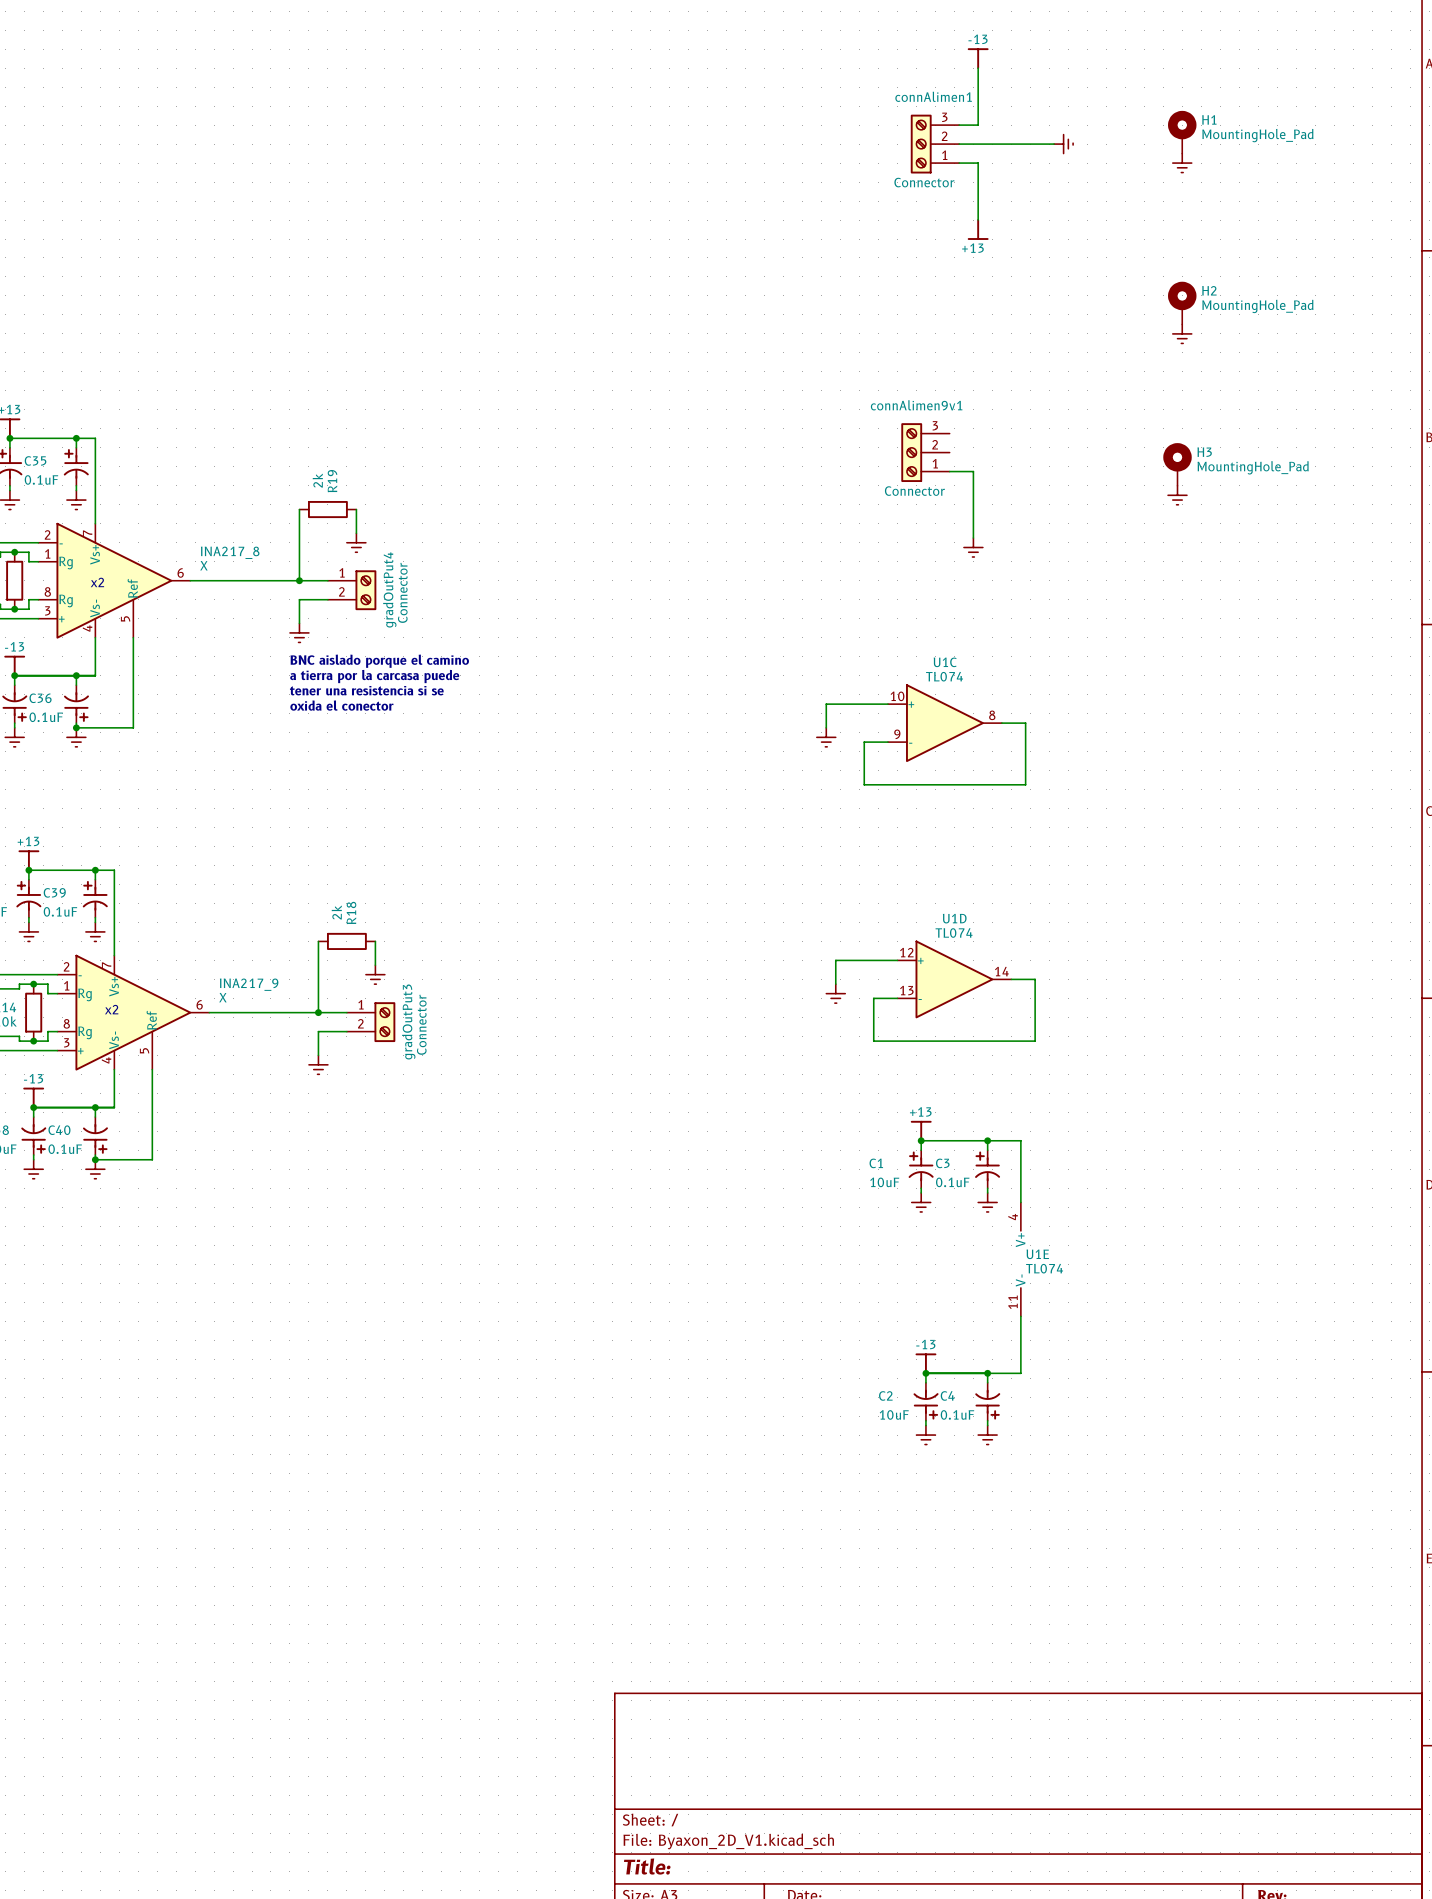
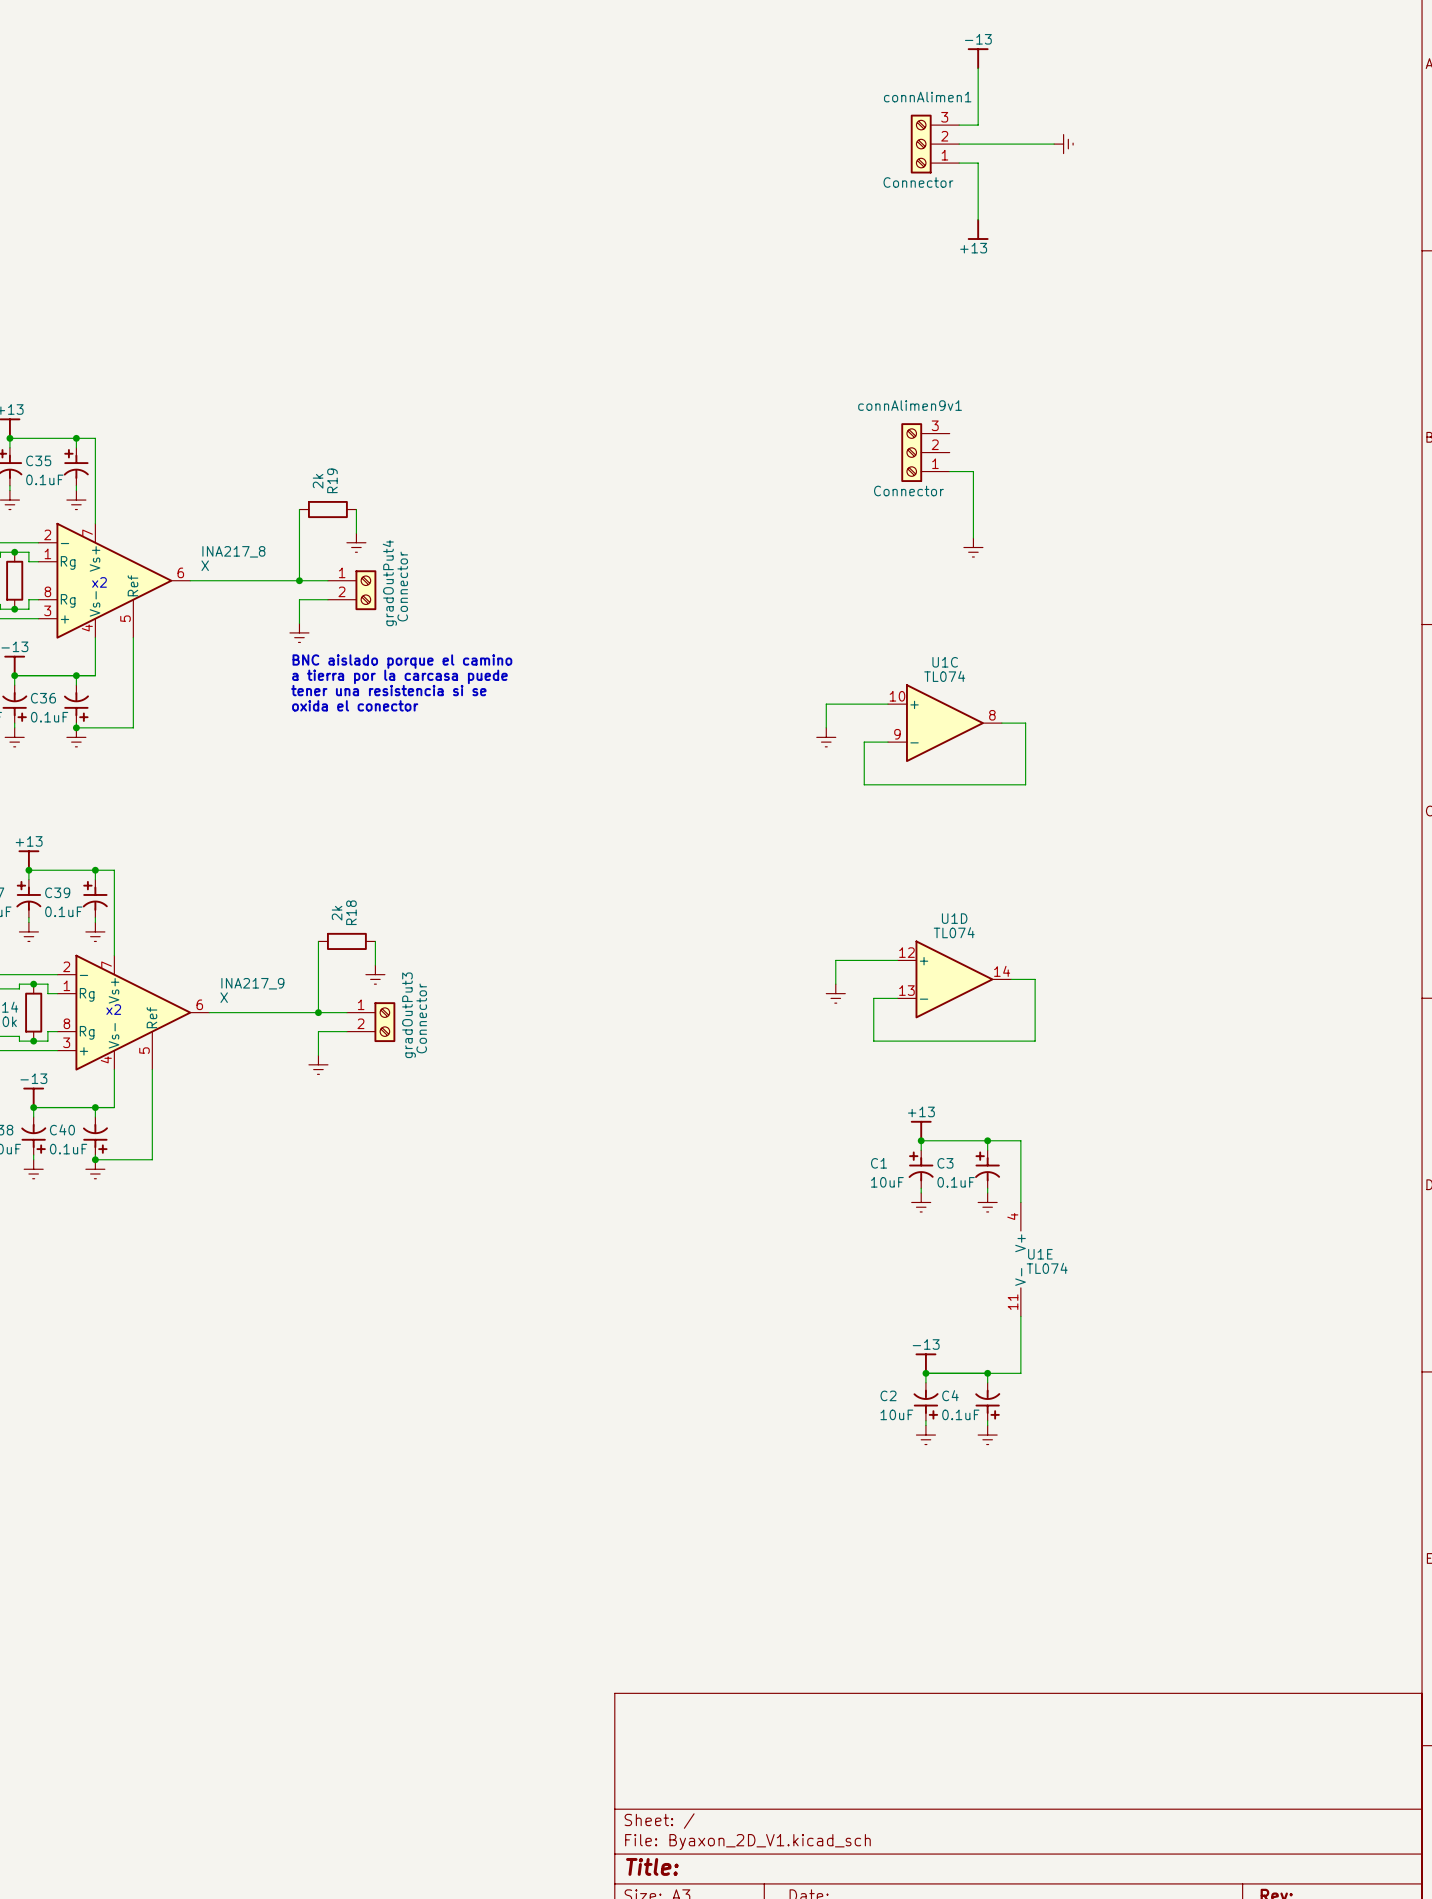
H1: MountingHole_Pad (1182, 132) -> none
power symbol: (1182, 163) -> none
H2: MountingHole_Pad (1182, 303) -> none
power symbol: (1182, 333) -> none
H3: MountingHole_Pad (1177, 464) -> none
power symbol: (1177, 495) -> none

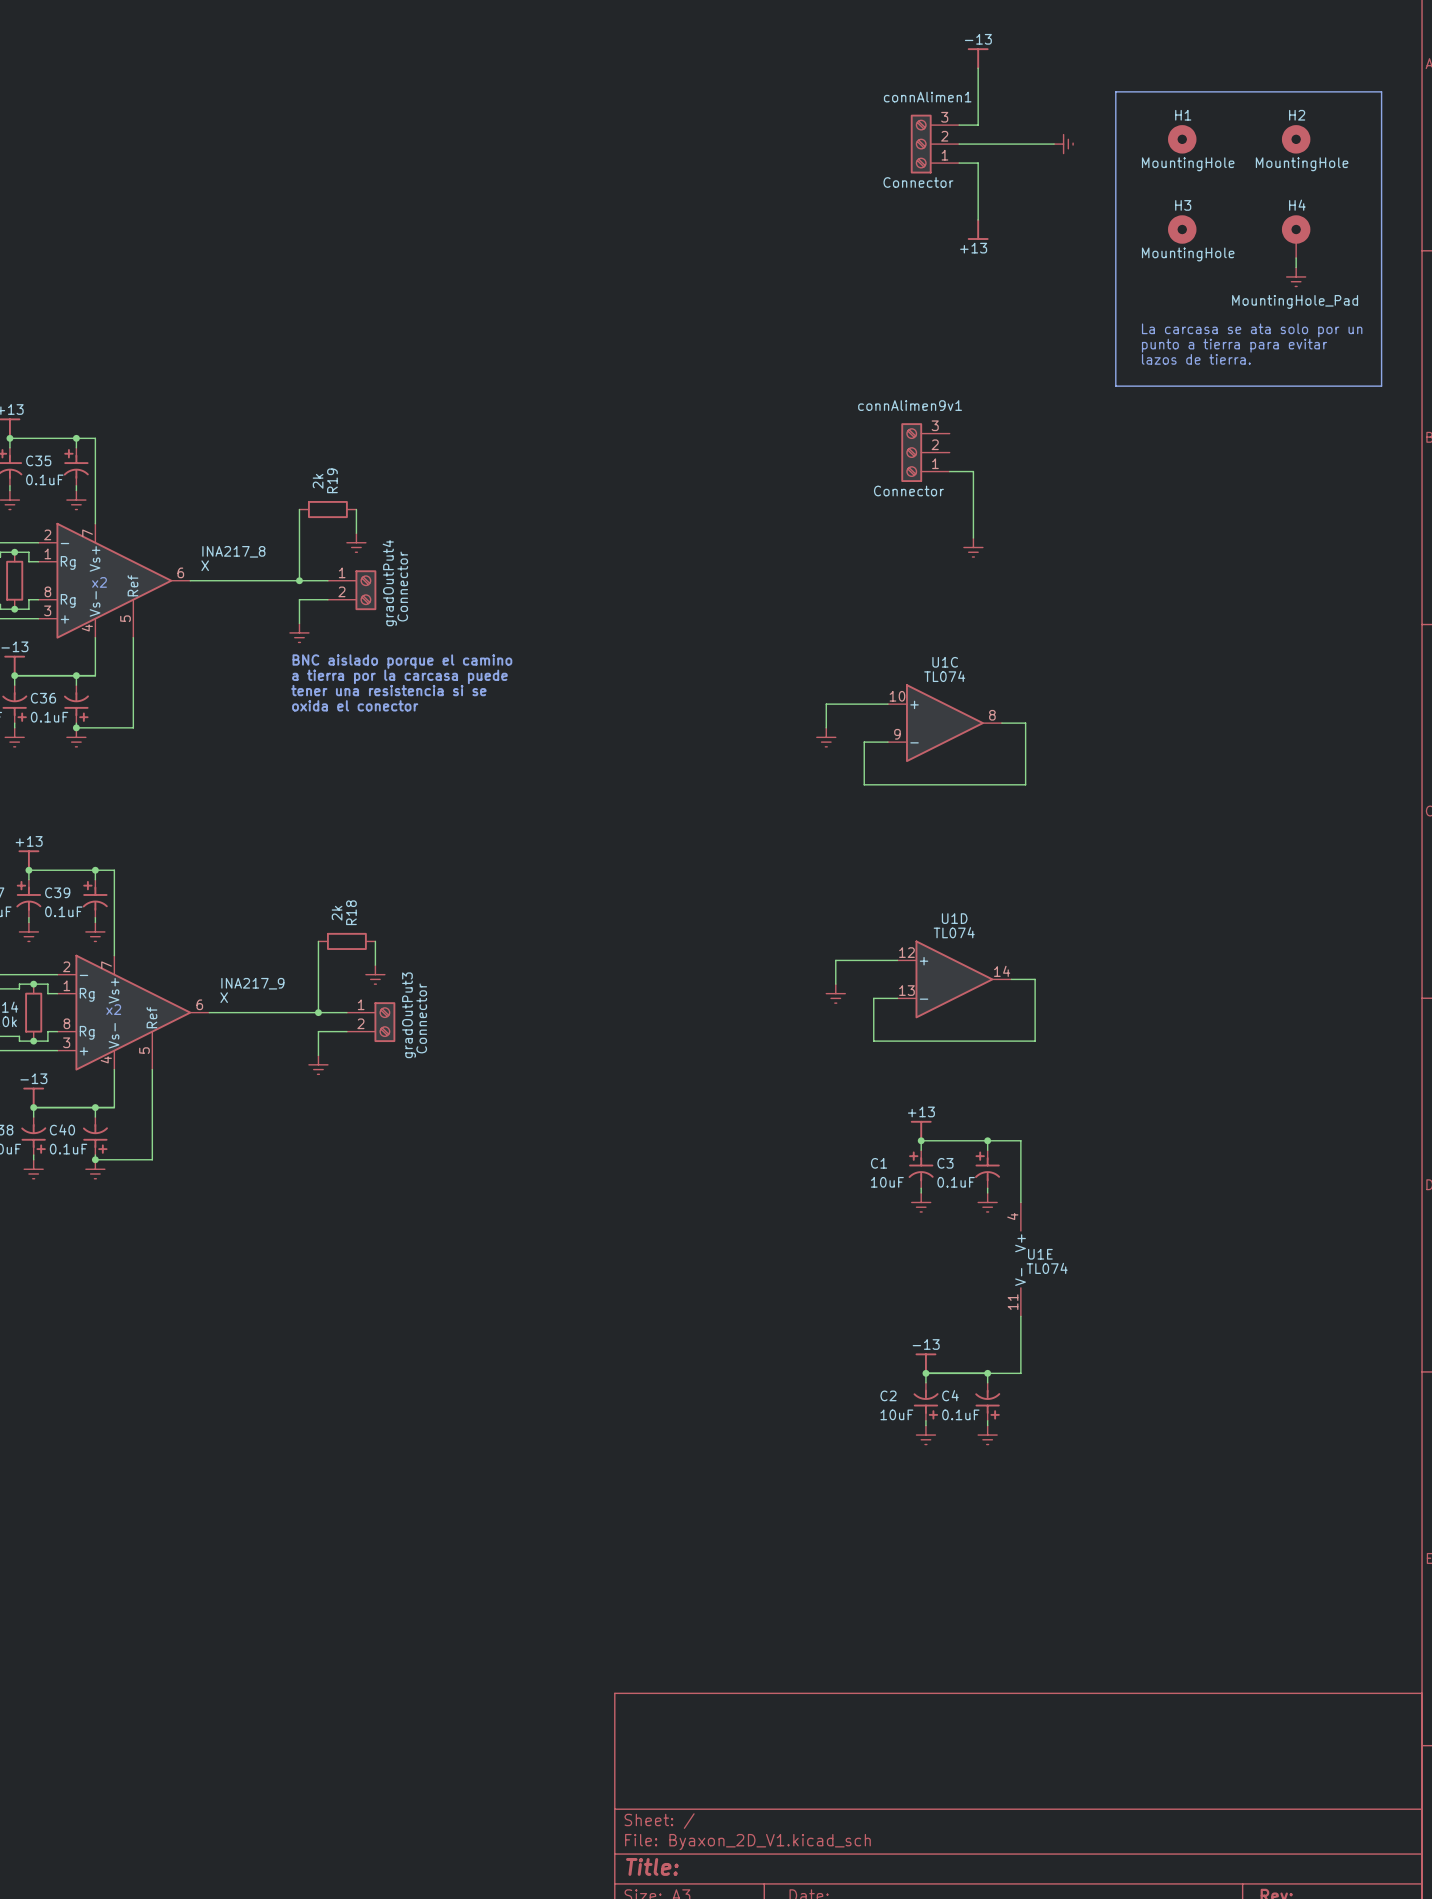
line: none -> (1115, 91) (1381, 91) (1381, 386) (1115, 386) (1115, 91)
H1: none -> MountingHole (1182, 139)
H2: none -> MountingHole (1296, 139)
H3: none -> MountingHole (1182, 229)
H4: none -> MountingHole_Pad (1296, 236)
wire: none -> (1296, 257) (1296, 267)
power symbol: none -> (1296, 276)
text: none -> La carcasa se ata solo por un (1252, 330)
text: none -> punto a tierra para evitar (1234, 345)
text: none -> lazos de tierra. (1196, 359)

